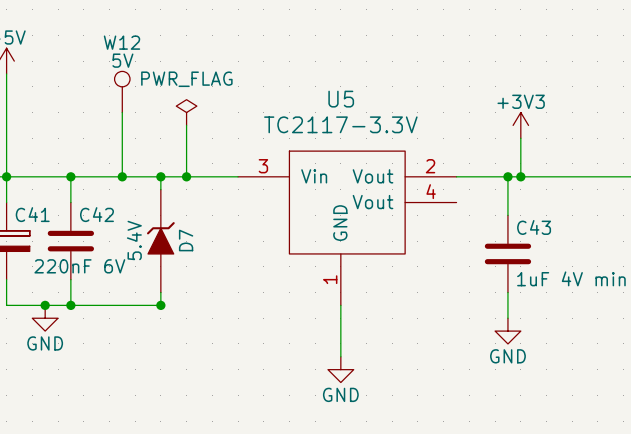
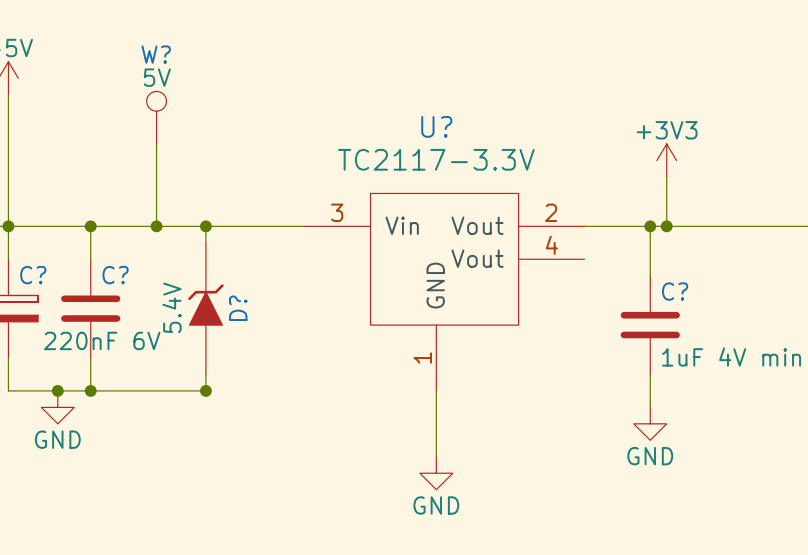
W12 name: W12 (121, 42) -> W? (156, 54)
U5 name: U5 (341, 99) -> U? (436, 126)
power symbol: PWR_FLAG (186, 112) -> none
wire: (186, 125) (186, 176) -> none
junction: (186, 176) -> none
C41 name: C41 (32, 214) -> C? (33, 275)
C42 name: C42 (96, 214) -> C? (115, 275)
C43 name: C43 (534, 227) -> C? (675, 291)
D7 name: D7 (186, 240) -> D? (238, 308)

